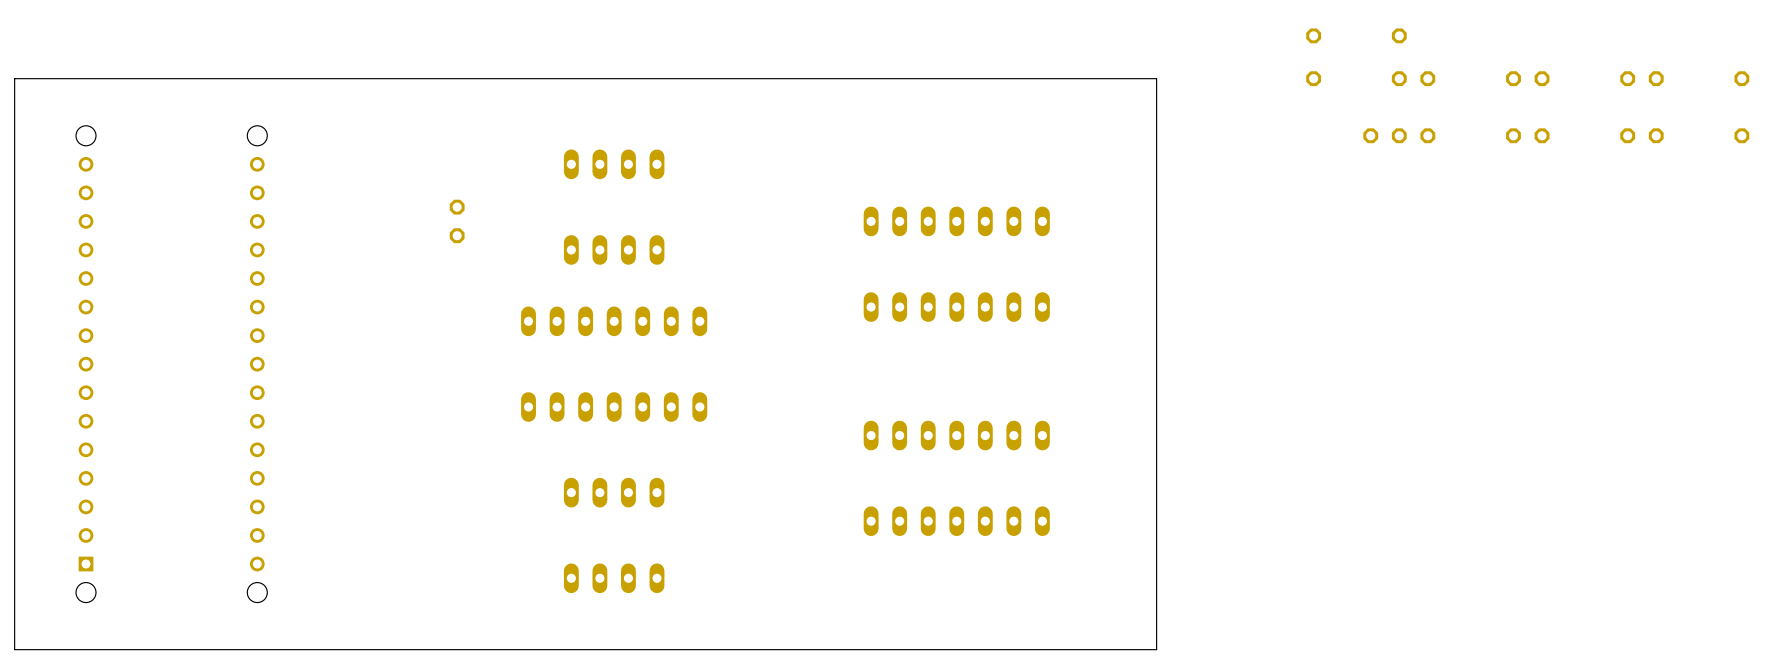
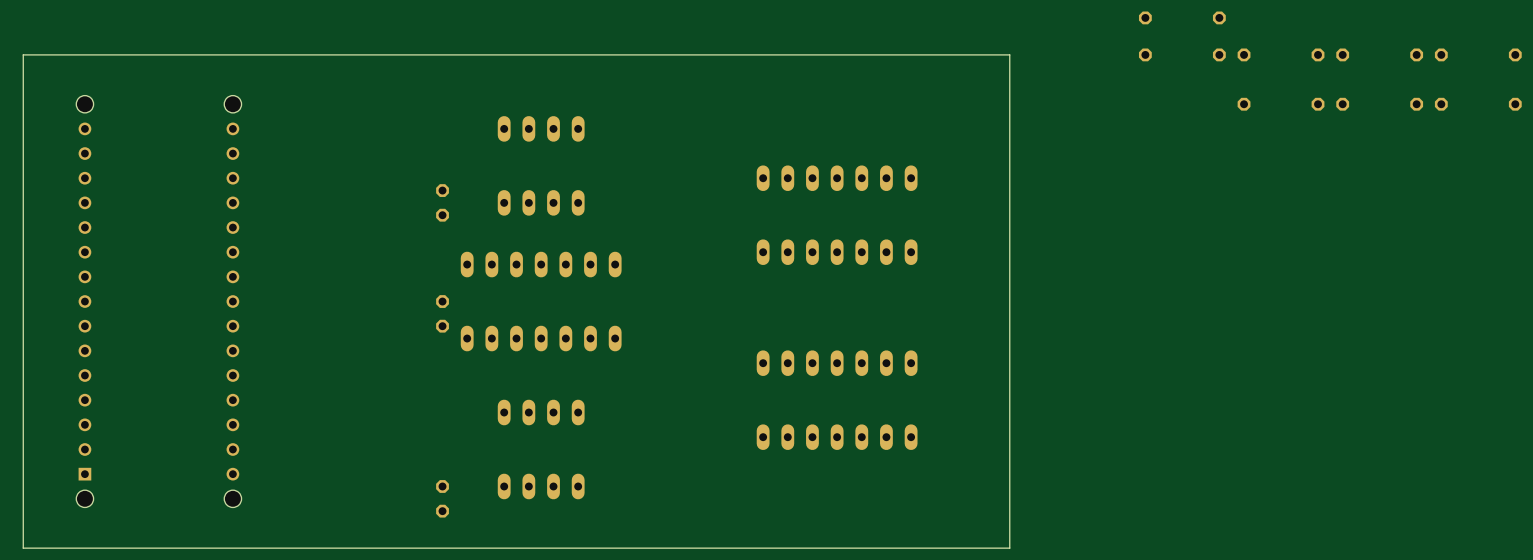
part: (1385, 135) -> none
part position: (457, 221) -> (442, 202)
part: none -> (442, 313)
part: none -> (442, 498)

